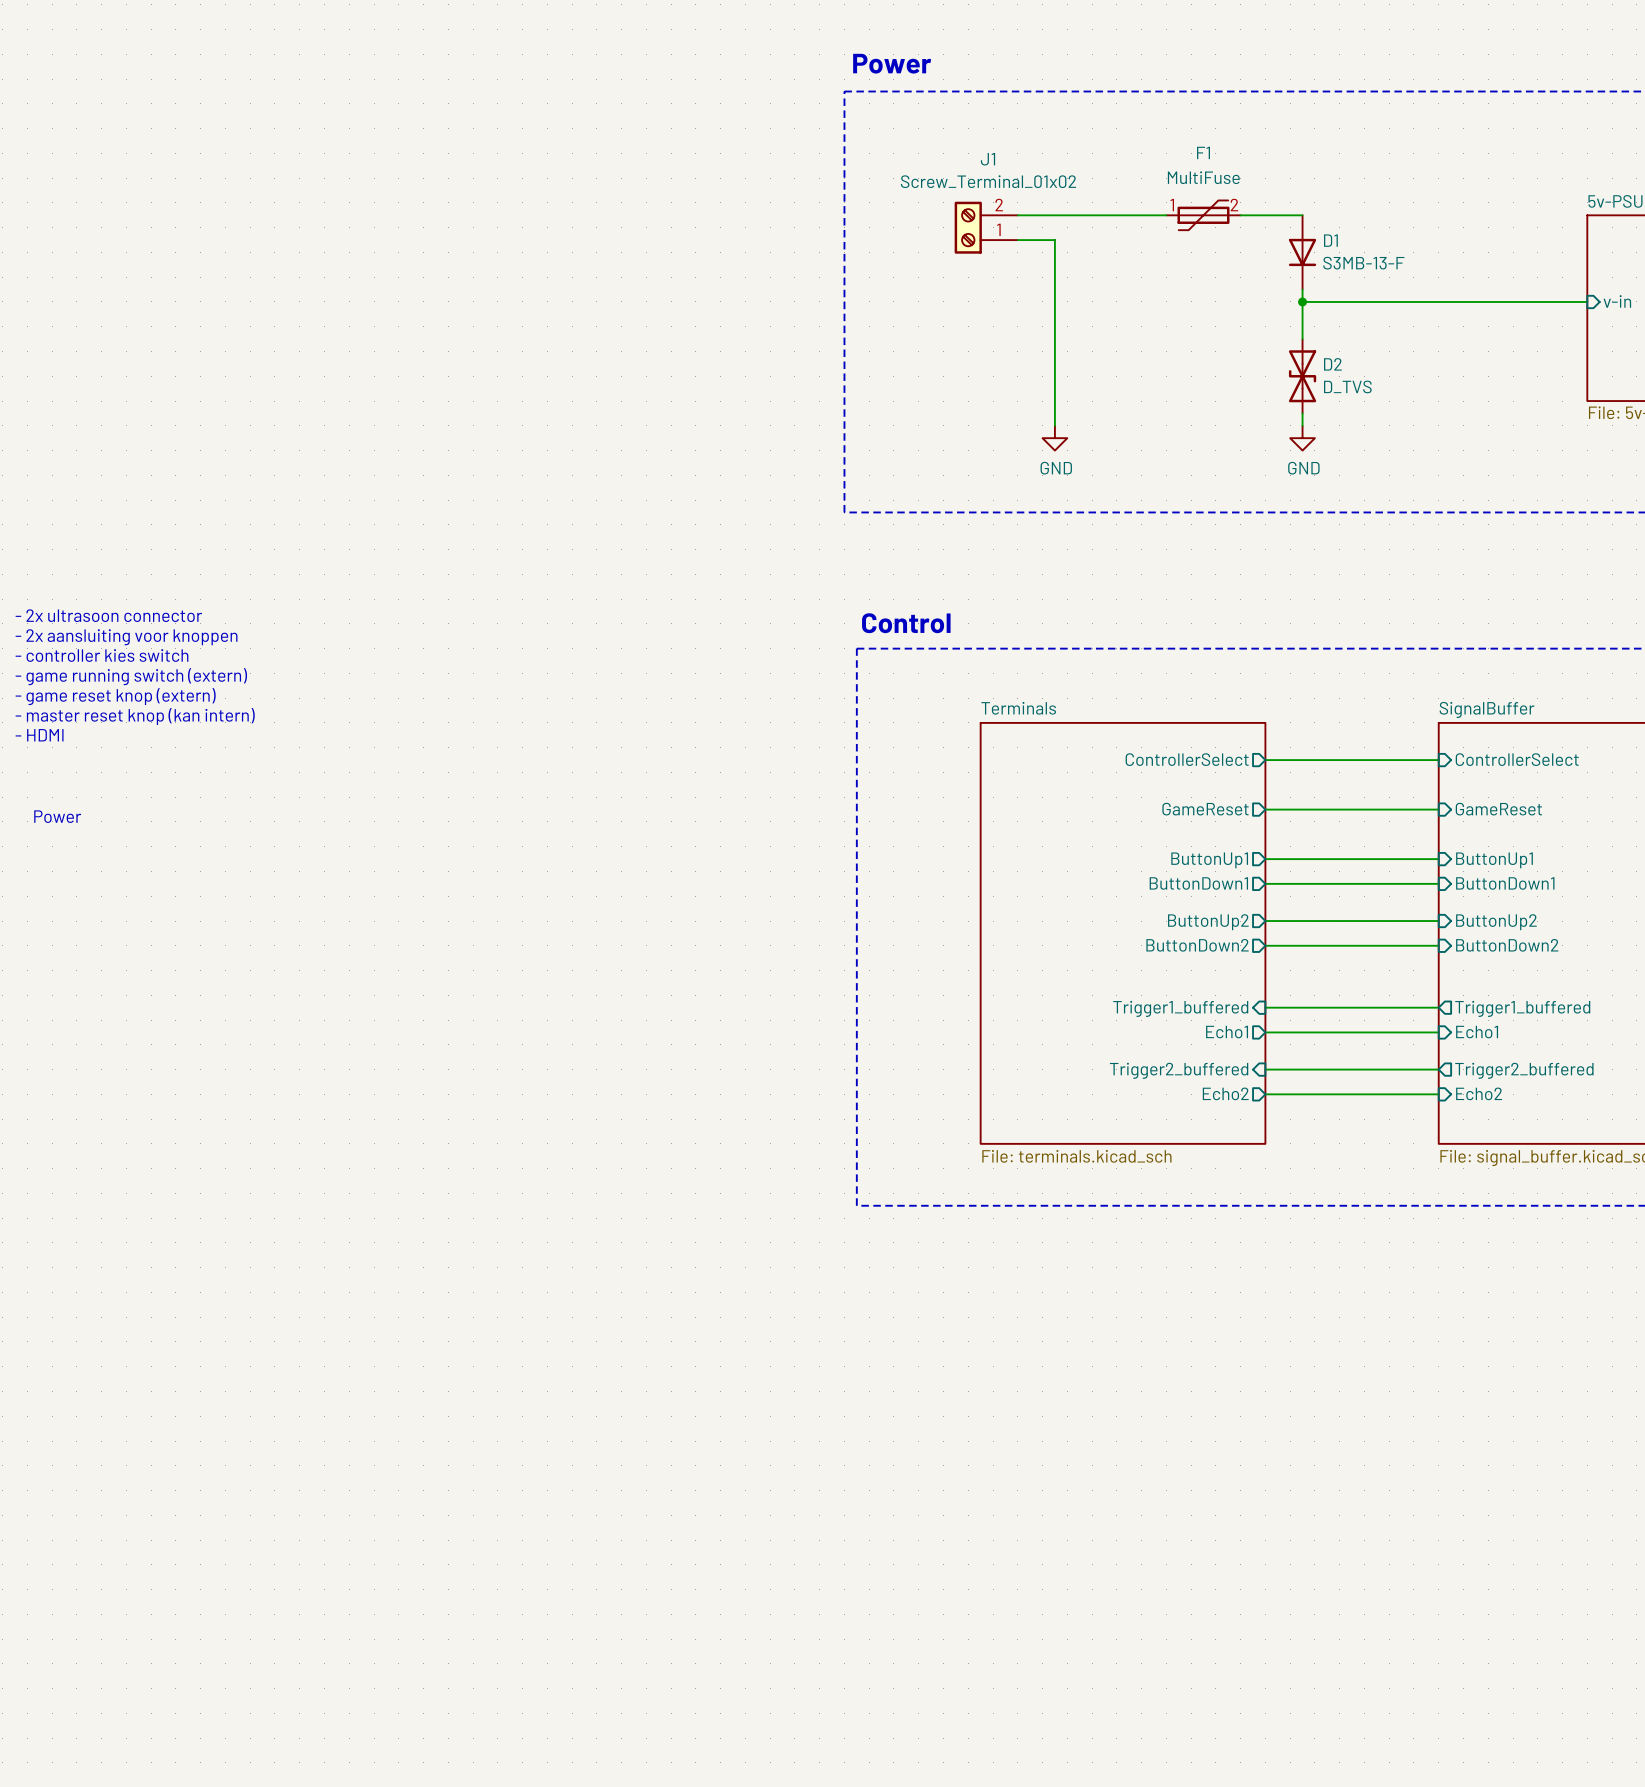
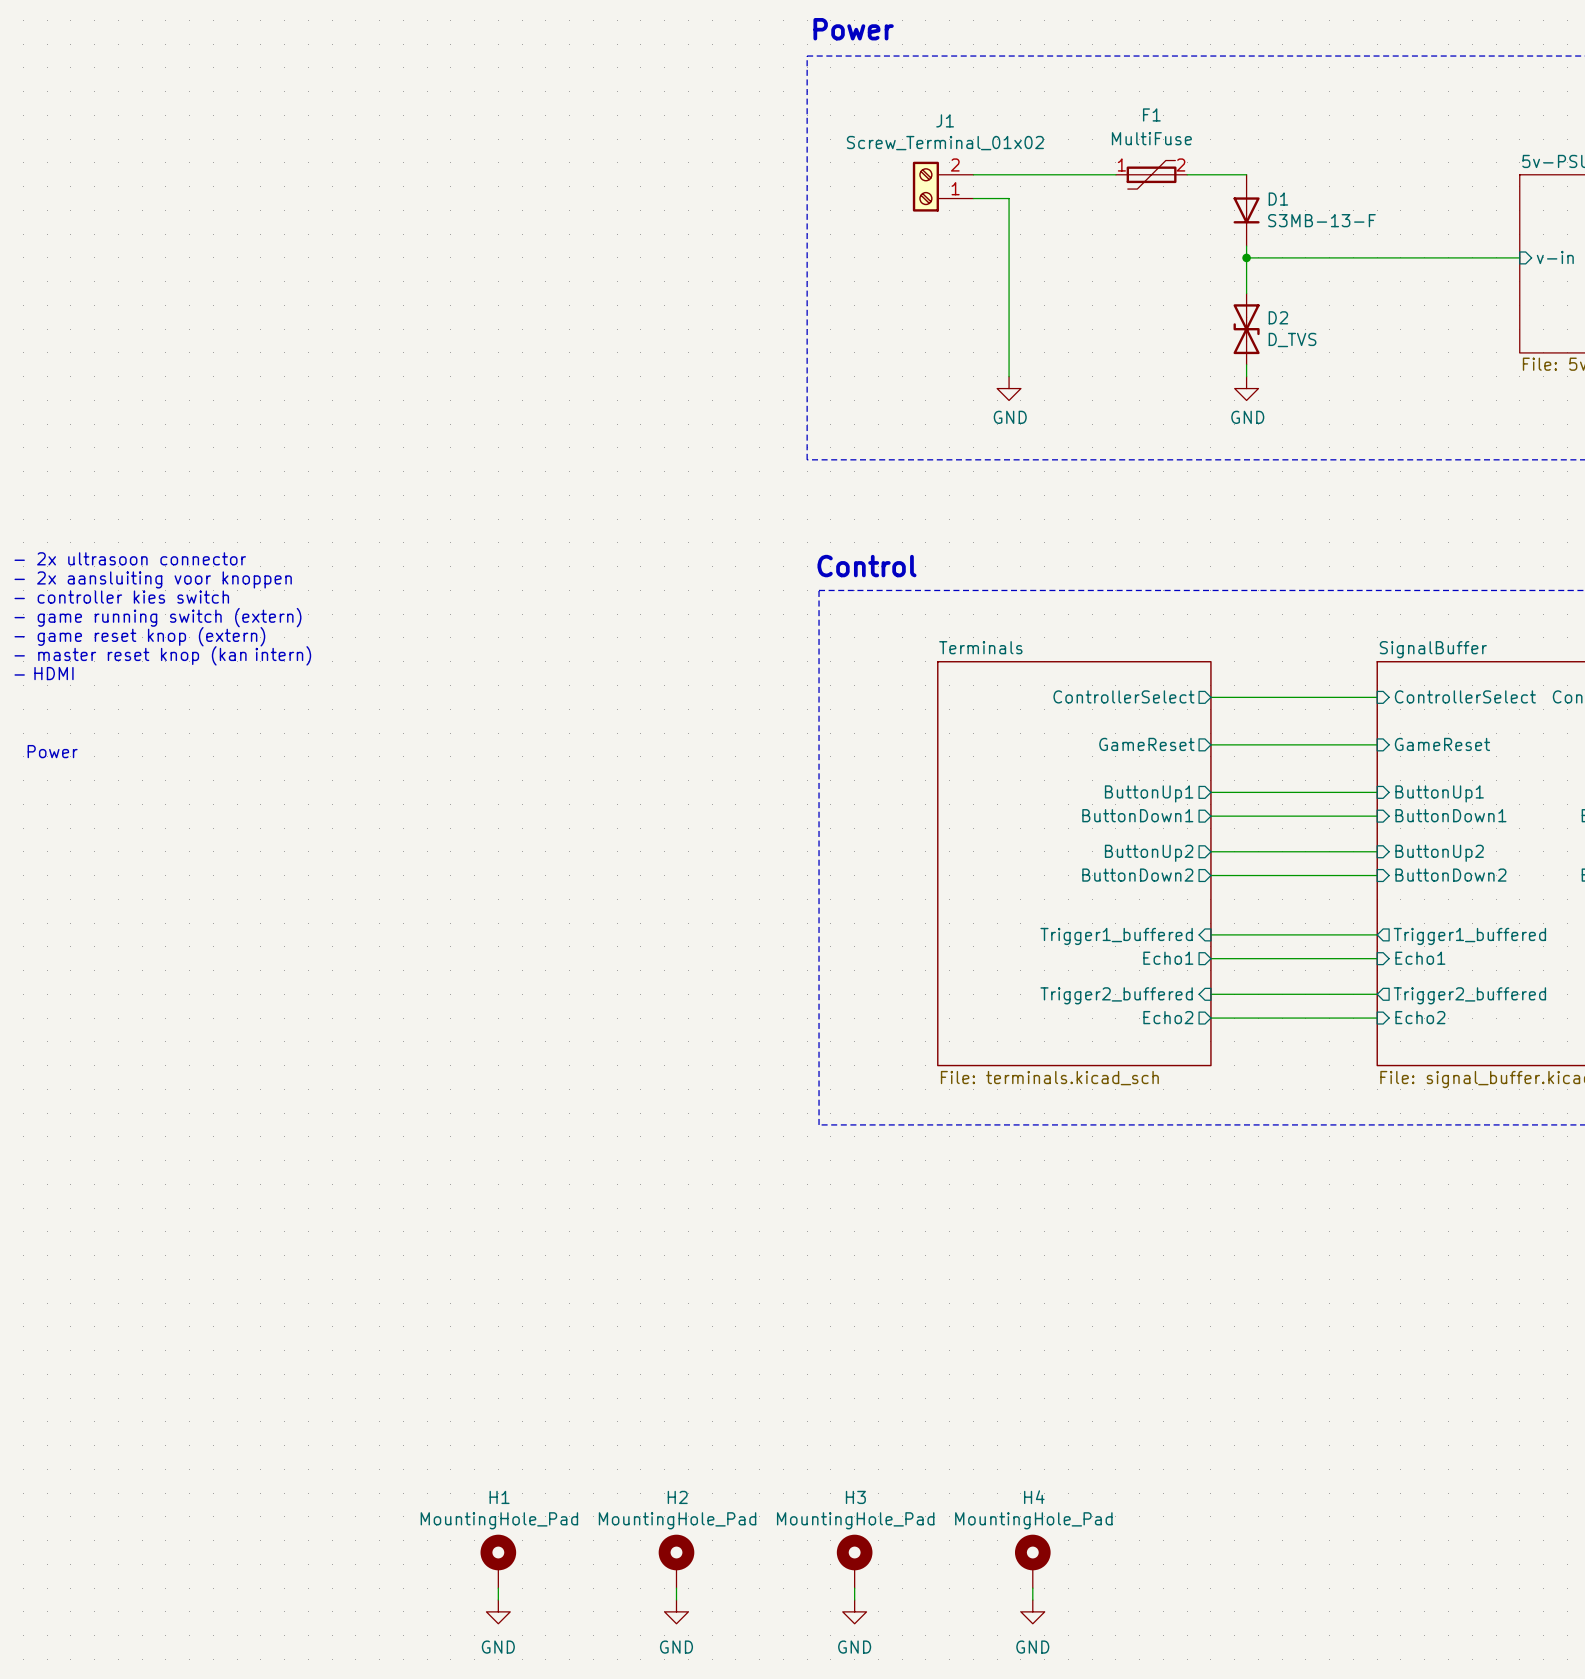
H1: none -> MountingHole_Pad (498, 1561)
H2: none -> MountingHole_Pad (676, 1561)
H3: none -> MountingHole_Pad (854, 1561)
H4: none -> MountingHole_Pad (1032, 1561)
wire: none -> (498, 1588) (498, 1600)
wire: none -> (676, 1588) (676, 1600)
wire: none -> (854, 1588) (854, 1600)
wire: none -> (1032, 1588) (1032, 1600)
power symbol: none -> GND (498, 1611)
power symbol: none -> GND (676, 1611)
power symbol: none -> GND (854, 1611)
power symbol: none -> GND (1032, 1611)

